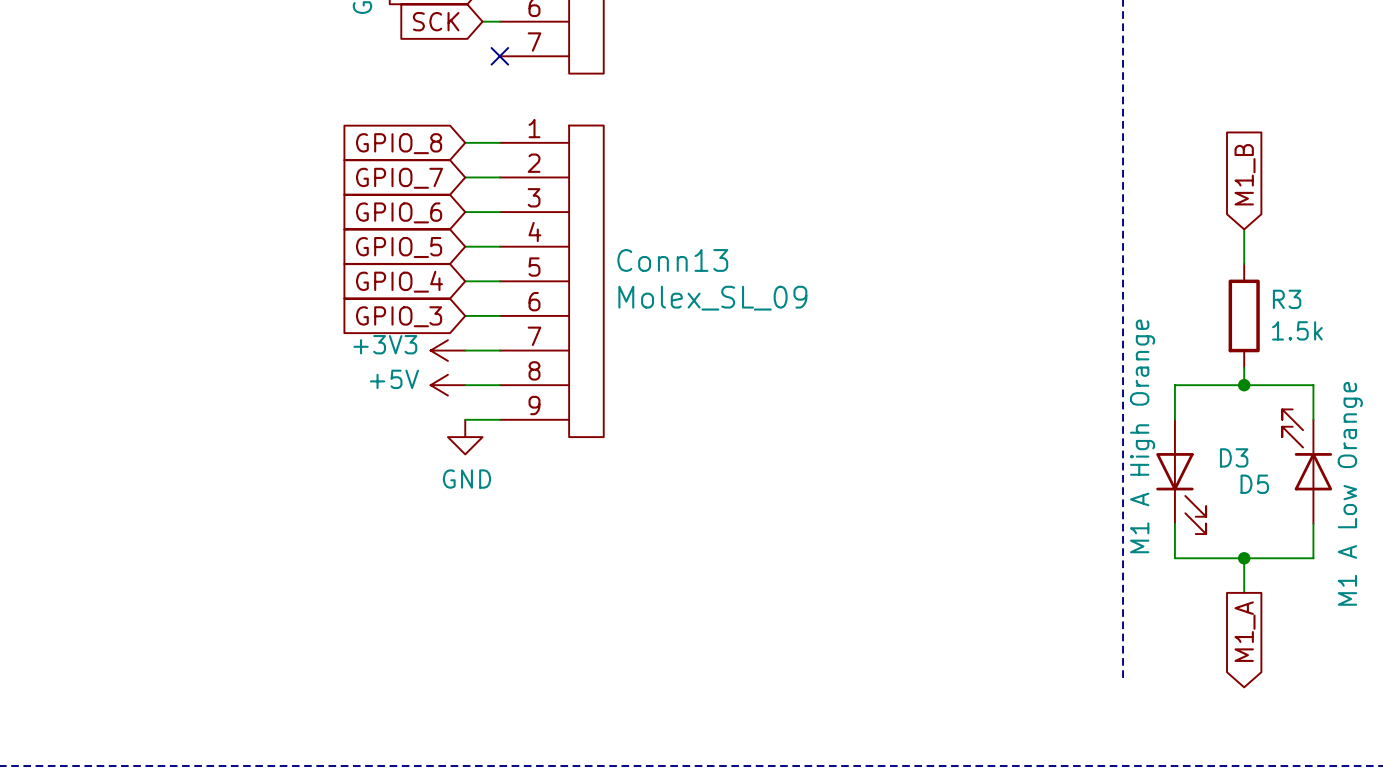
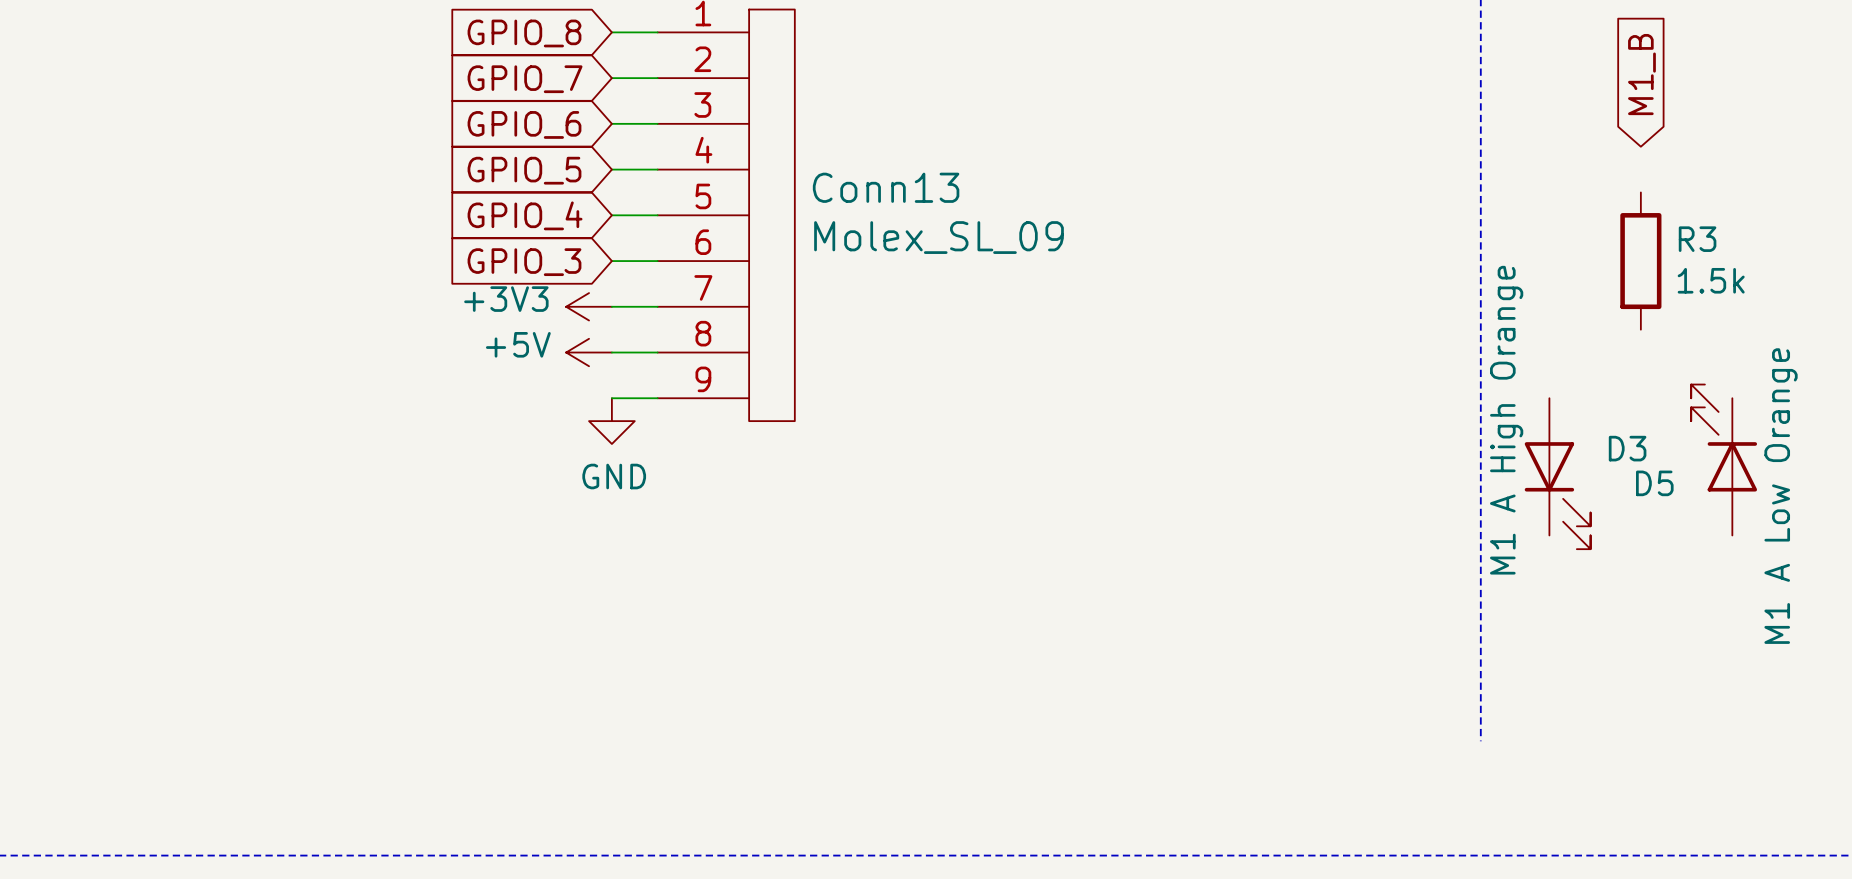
wire: (1244, 229) (1244, 264) -> none
wire: (1244, 367) (1244, 385) -> none
junction: (1244, 385) -> none
wire: (1174, 419) (1174, 385) (1313, 385) (1313, 419) -> none
wire: (1174, 523) (1174, 558) (1313, 558) (1313, 523) -> none
wire: (1244, 558) (1244, 592) -> none
junction: (1244, 558) -> none
global label: M1_A (1245, 631) -> none

